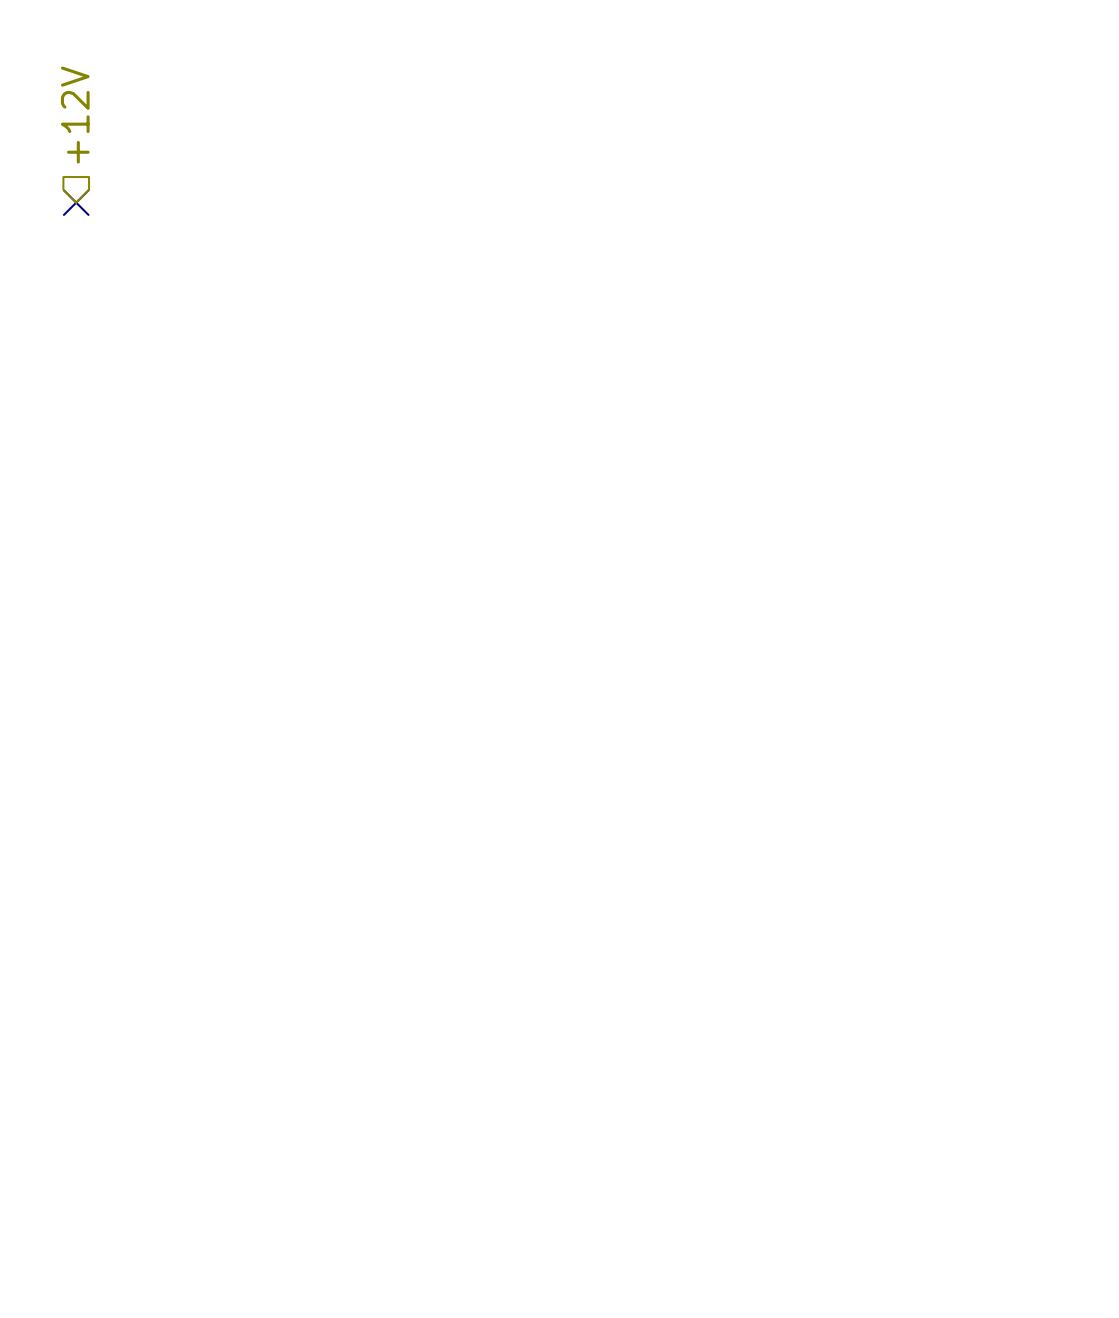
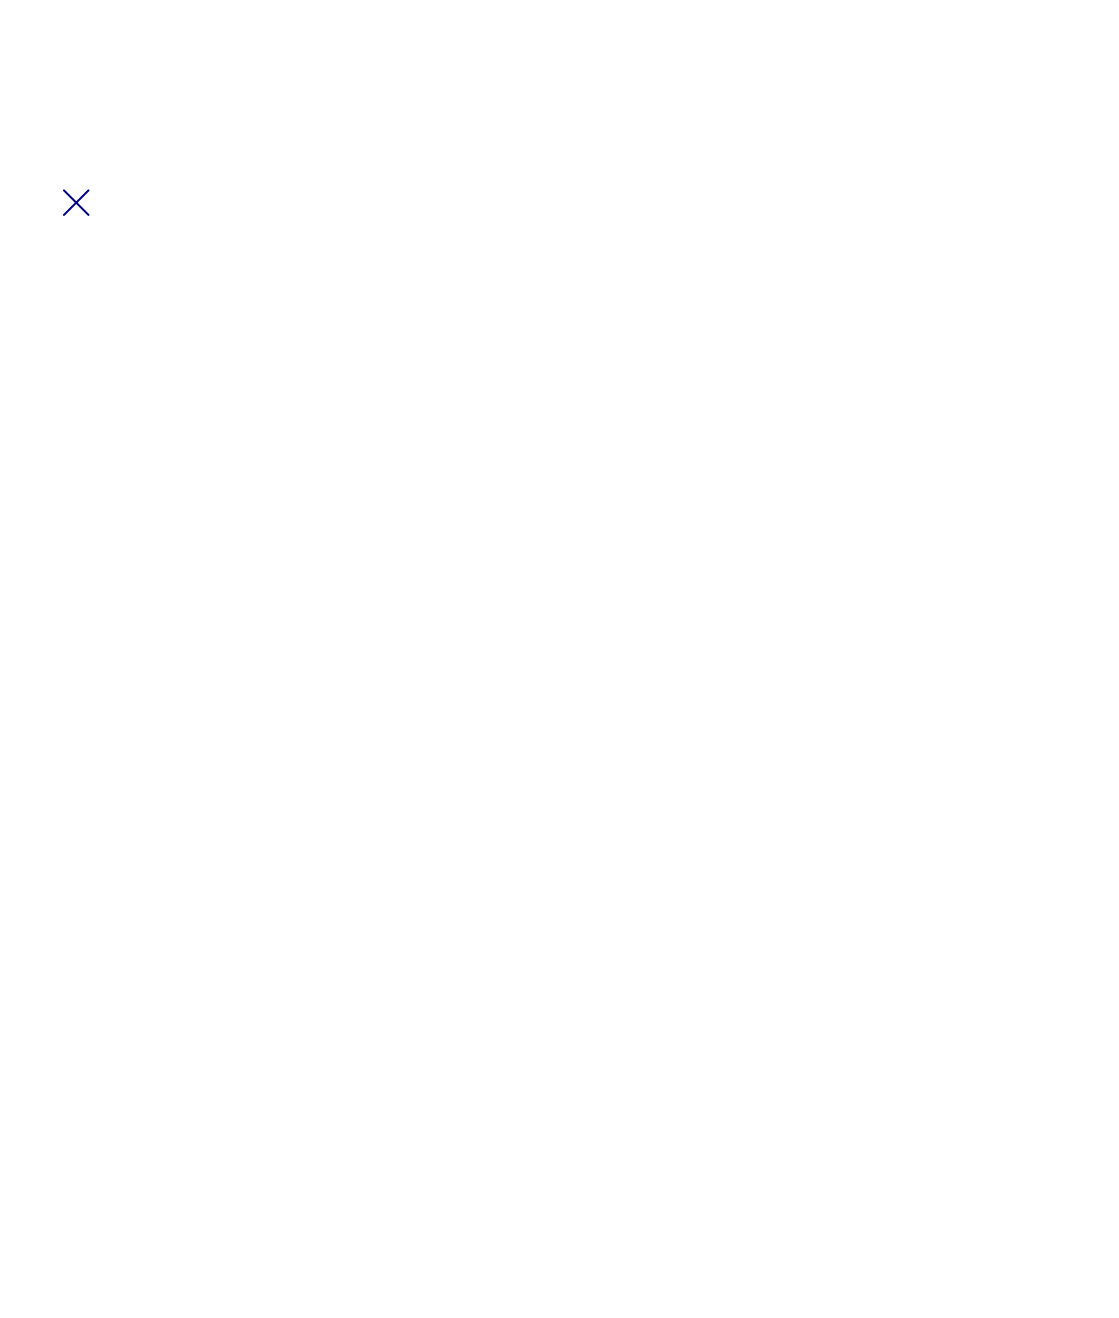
hierarchical label: +12V (75, 115) -> none

